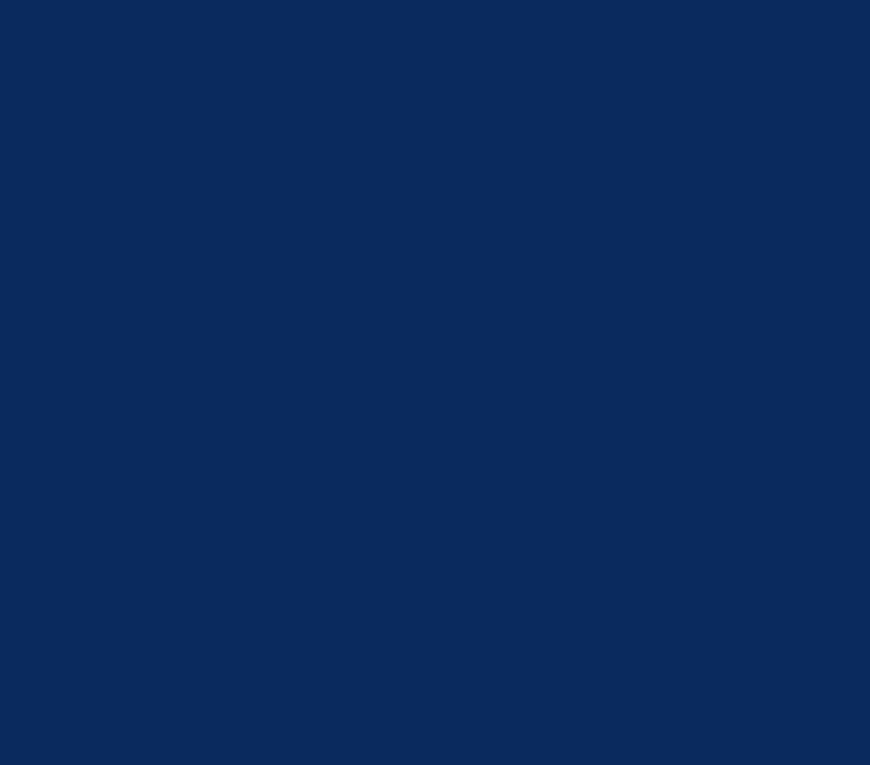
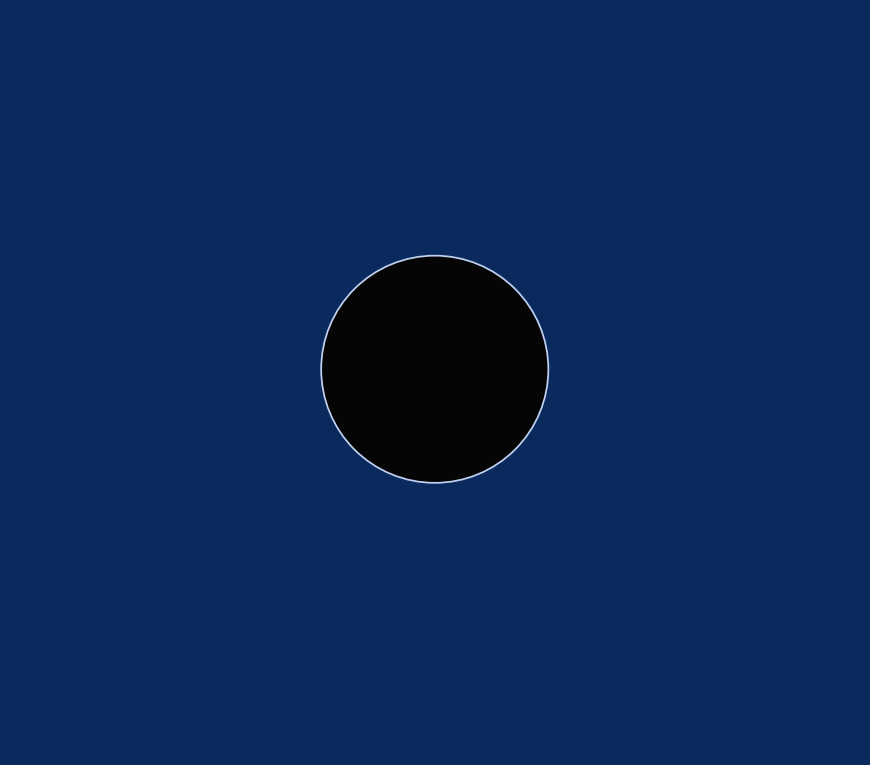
part: none -> (434, 369)

